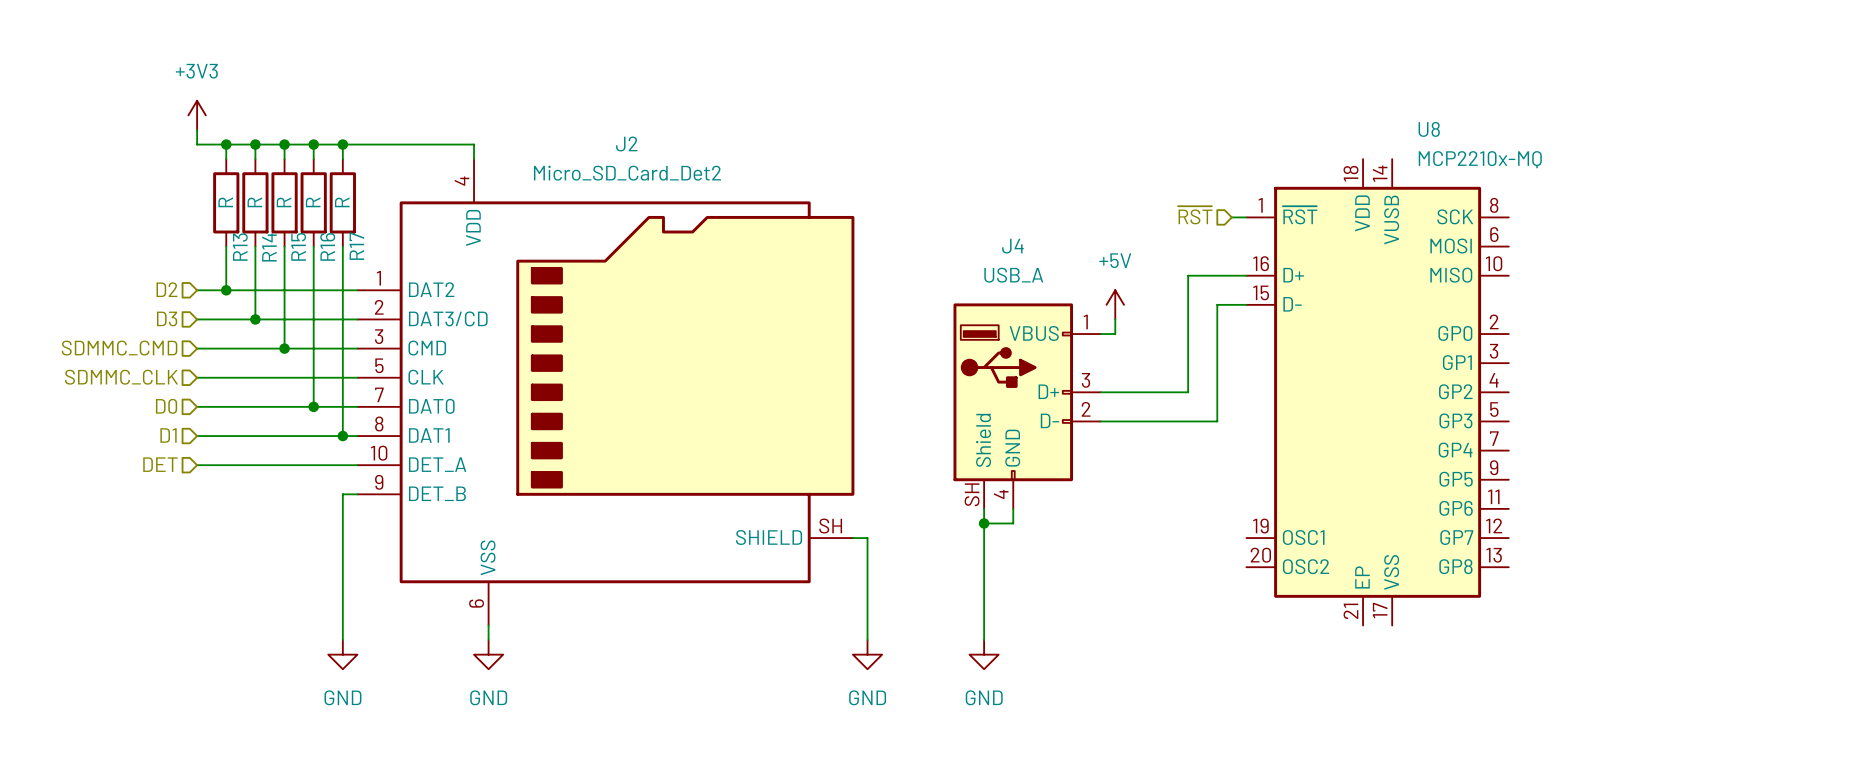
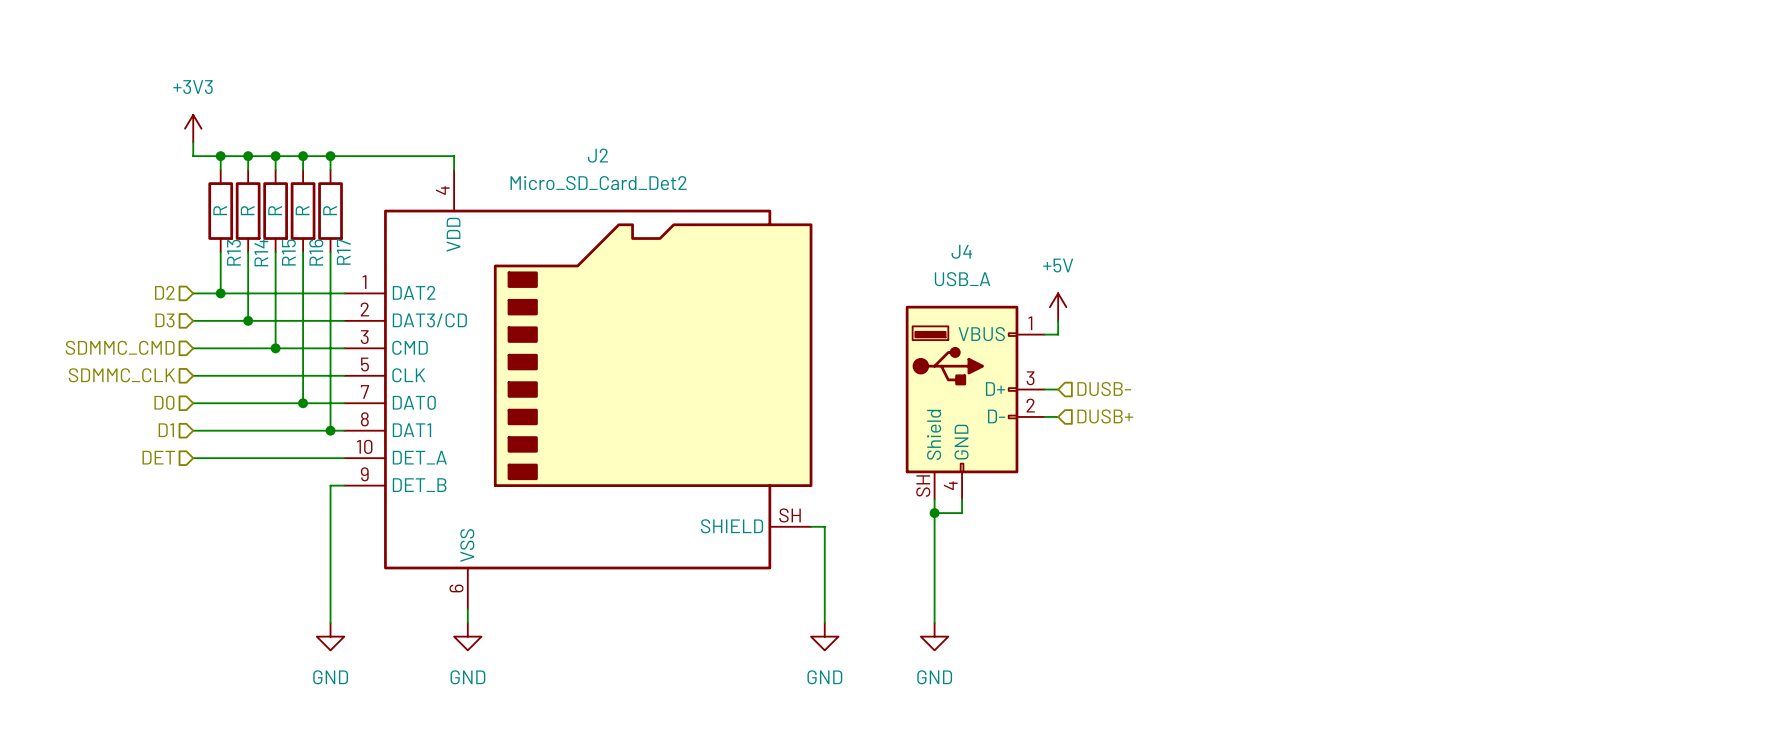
hierarchical label: ~{RST} (1195, 215) -> none
wire: (1231, 217) (1246, 217) -> none
wire: (1246, 275) (1188, 275) (1188, 392) (1115, 392) -> none
wire: (1246, 304) (1217, 304) (1217, 421) (1115, 421) -> none
hierarchical label: none -> DUSB- (1104, 389)
U8: MCP2210x-MQ (1377, 392) -> none
hierarchical label: none -> DUSB+ (1105, 416)

